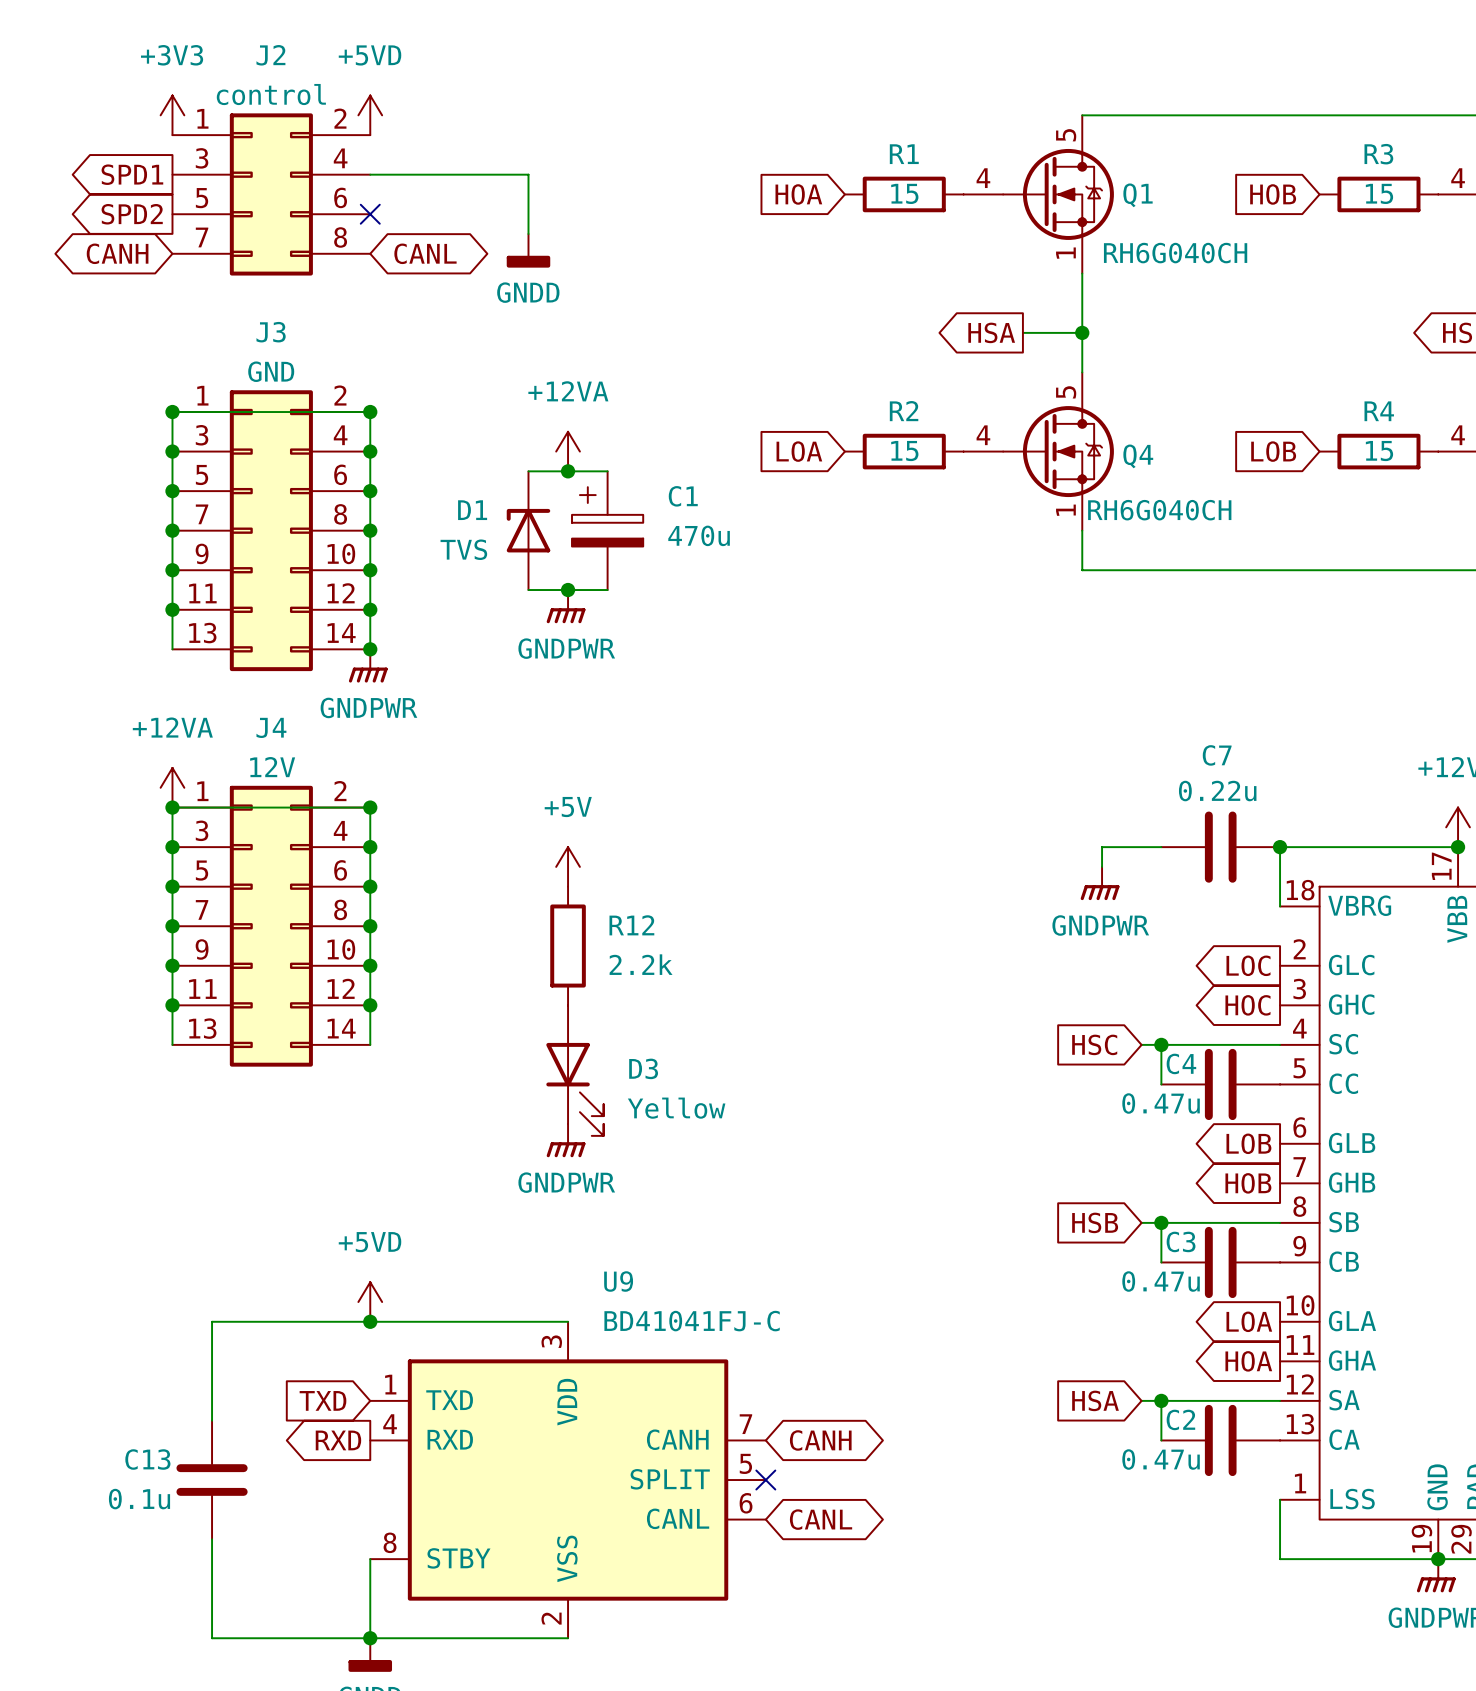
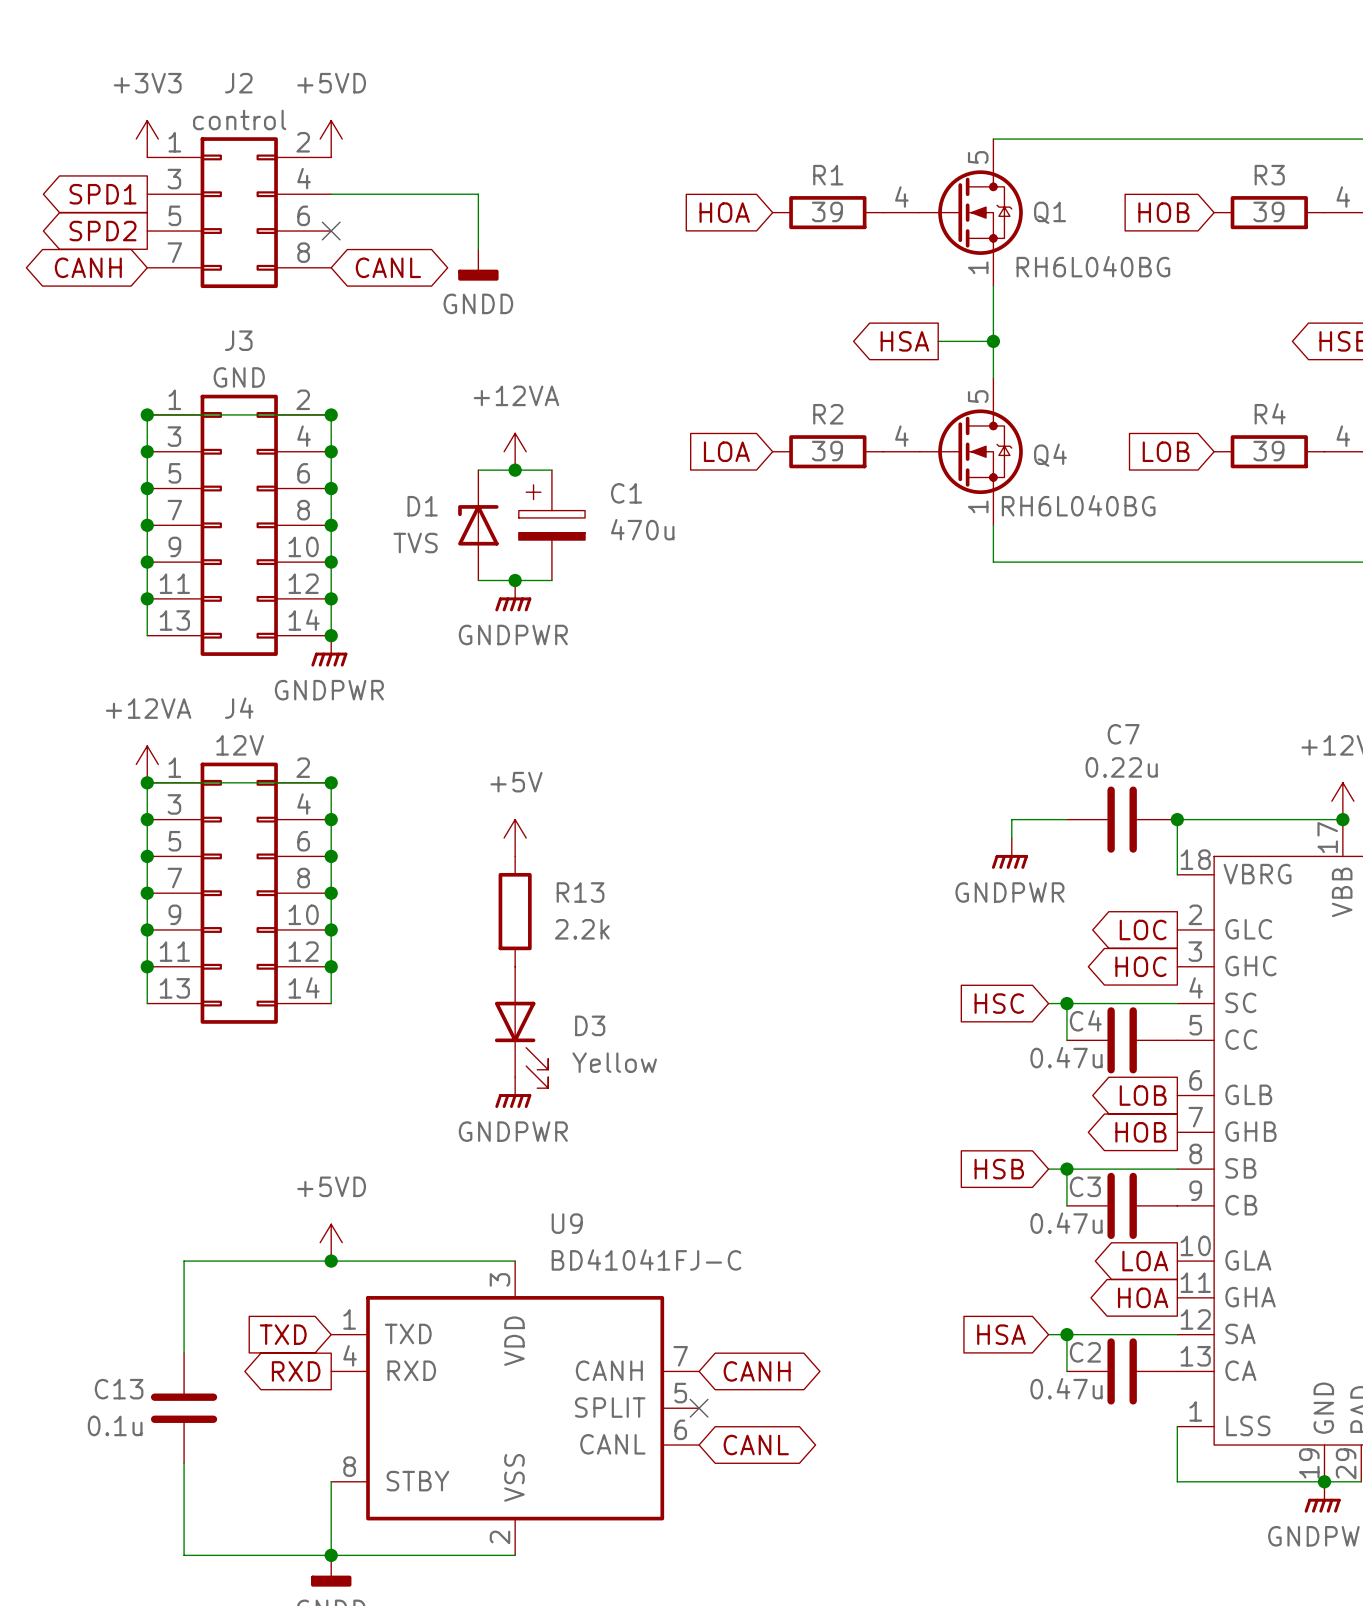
R1 value: 15 (904, 193) -> 39 (827, 211)
R3 value: 15 (1379, 193) -> 39 (1268, 211)
Q1 value: RH6G040CH (1175, 253) -> RH6L040BG (1093, 266)
R2 value: 15 (904, 451) -> 39 (827, 451)
R4 value: 15 (1379, 451) -> 39 (1268, 451)
Q4 value: RH6G040CH (1159, 510) -> RH6L040BG (1078, 505)
R12 name: R12 (631, 925) -> R13 (580, 892)

